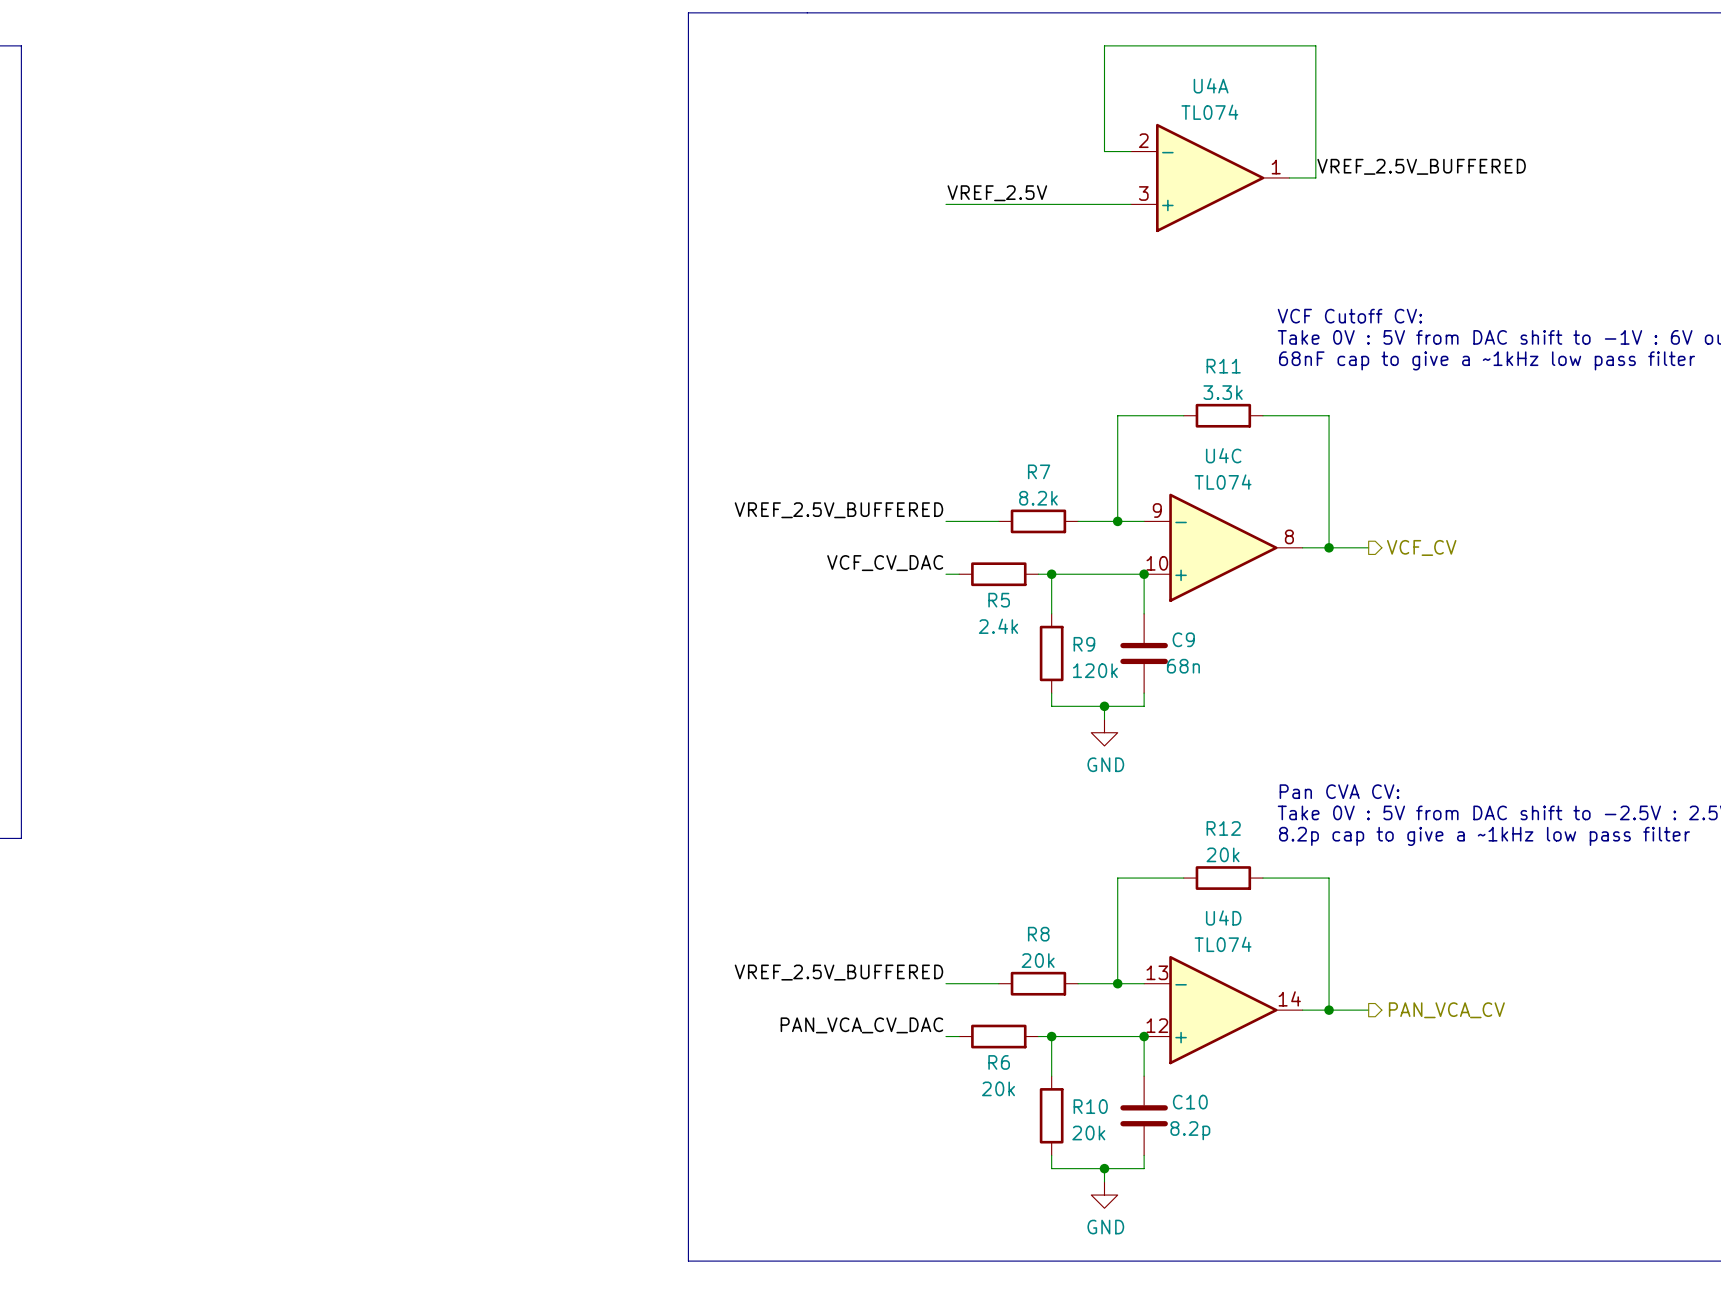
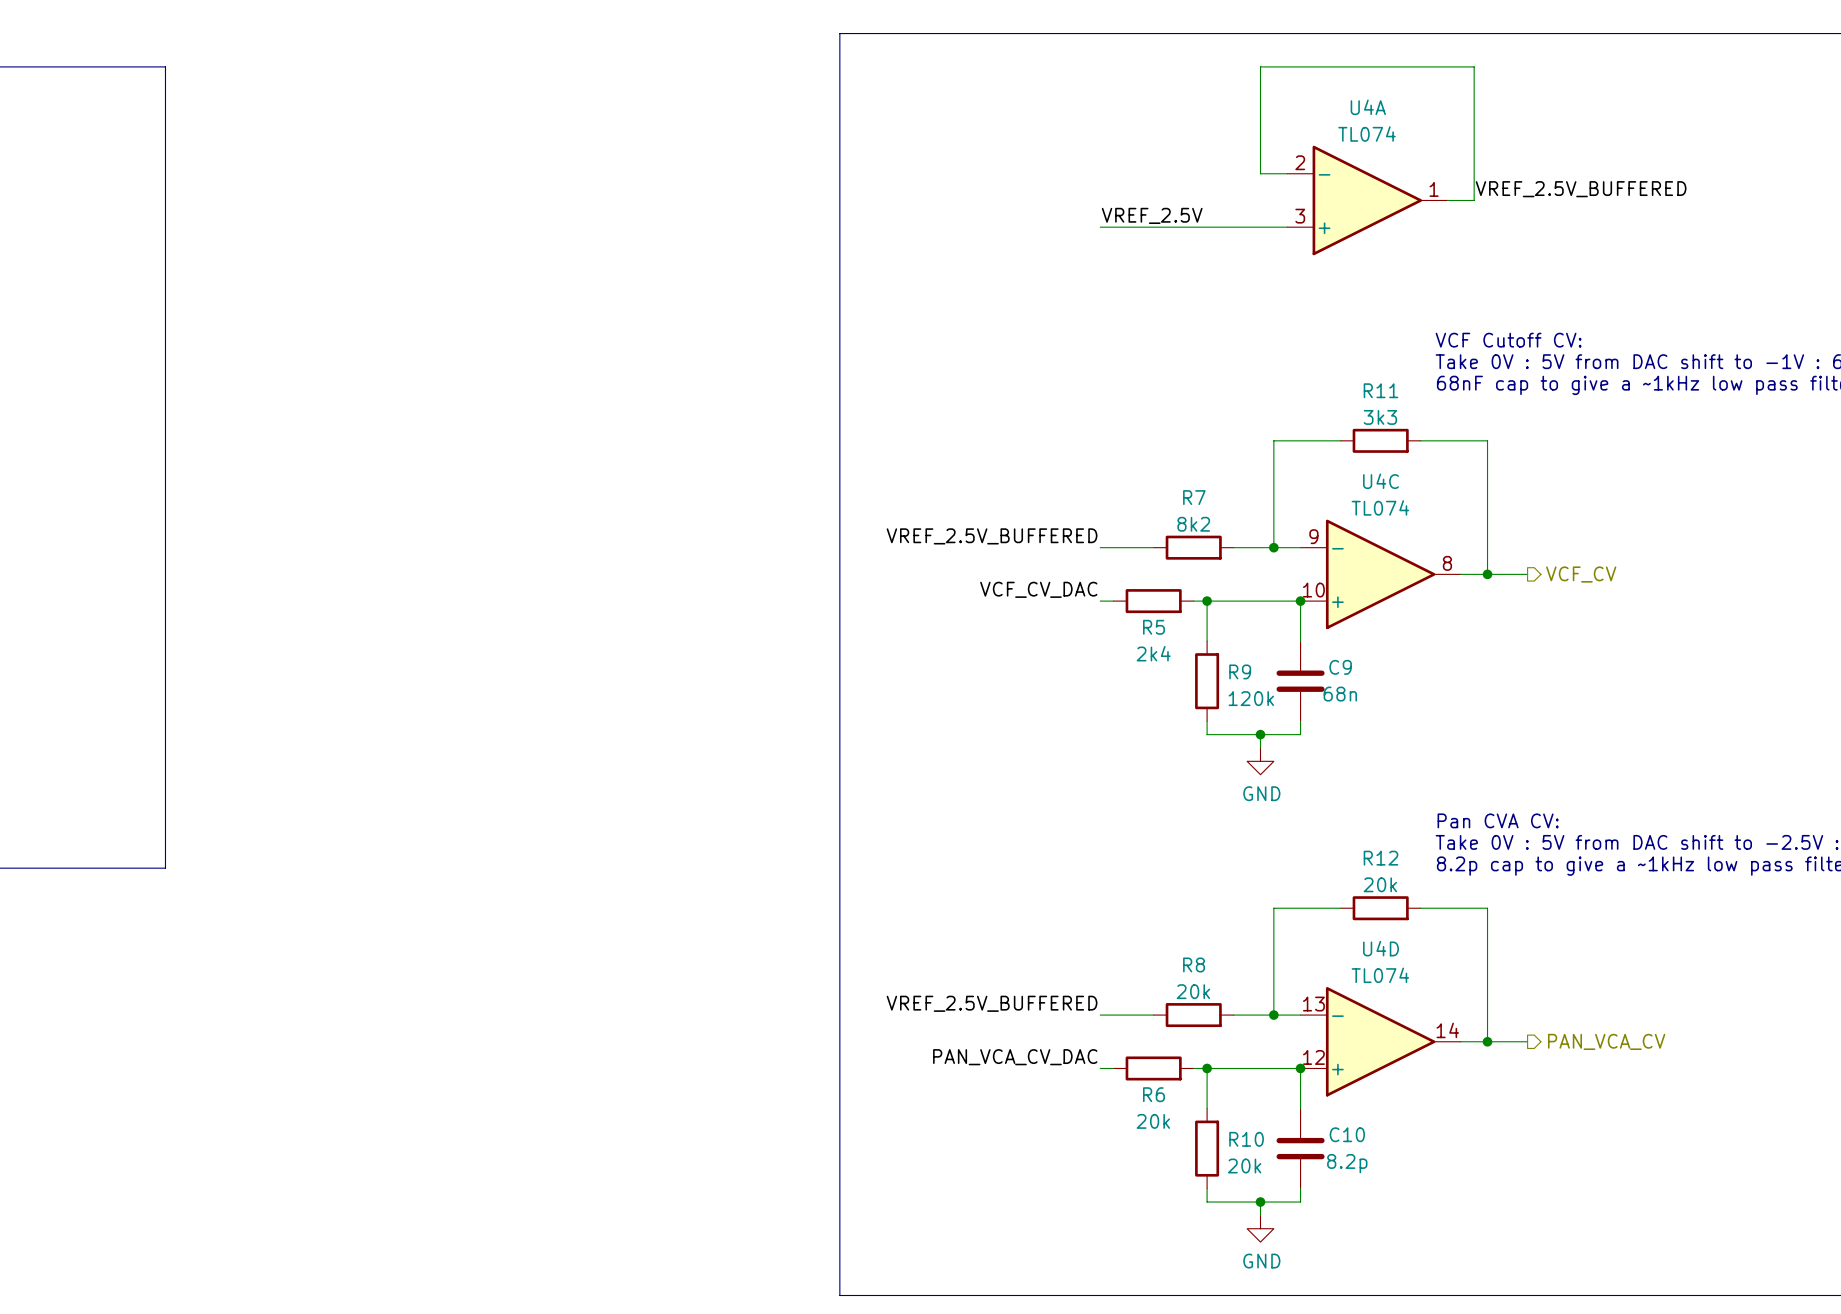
R11 value: 3.3k (1223, 392) -> 3k3 (1380, 417)
R7 value: 8.2k (1038, 498) -> 8k2 (1193, 524)
R5 value: 2.4k (998, 626) -> 2k4 (1153, 653)

